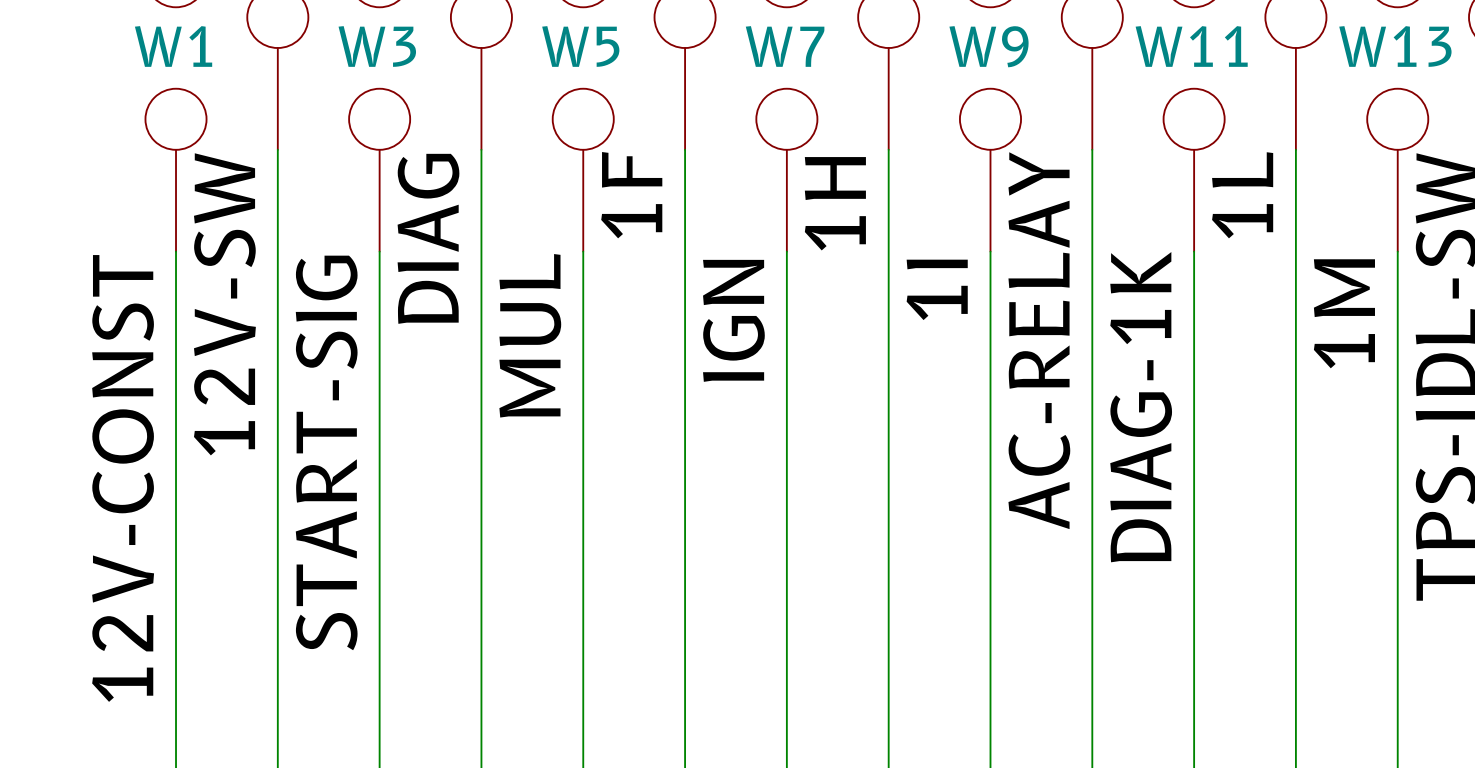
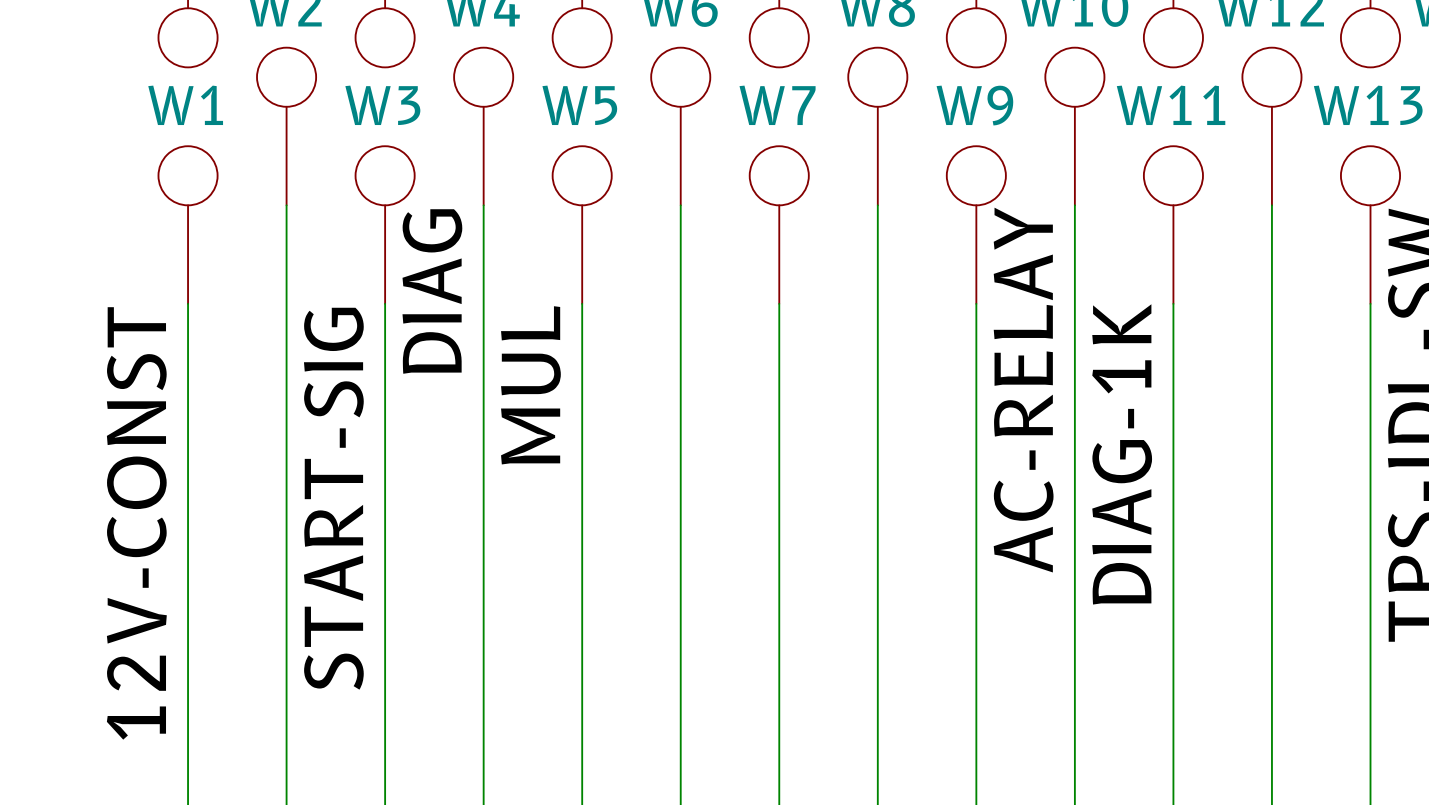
label: 1F (631, 195) -> none
label: 1L (1242, 195) -> none
label: 1H (835, 203) -> none
label: 1I (937, 289) -> none
label: 12V-SW (224, 304) -> none
label: 1M (1344, 313) -> none
label: IGN (733, 320) -> none

